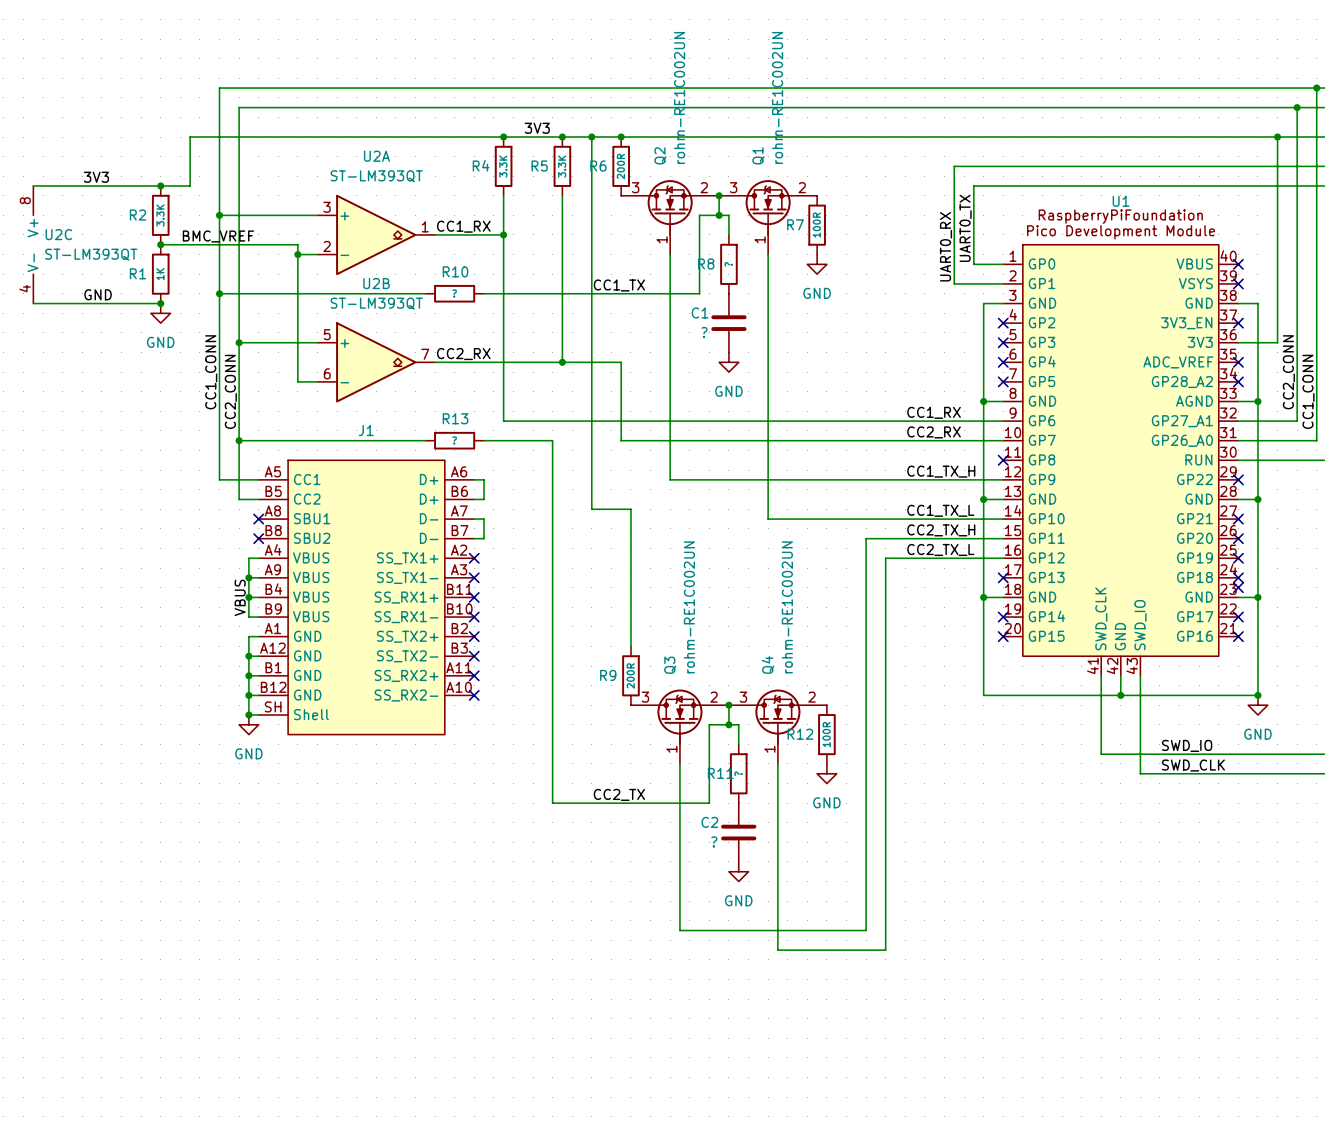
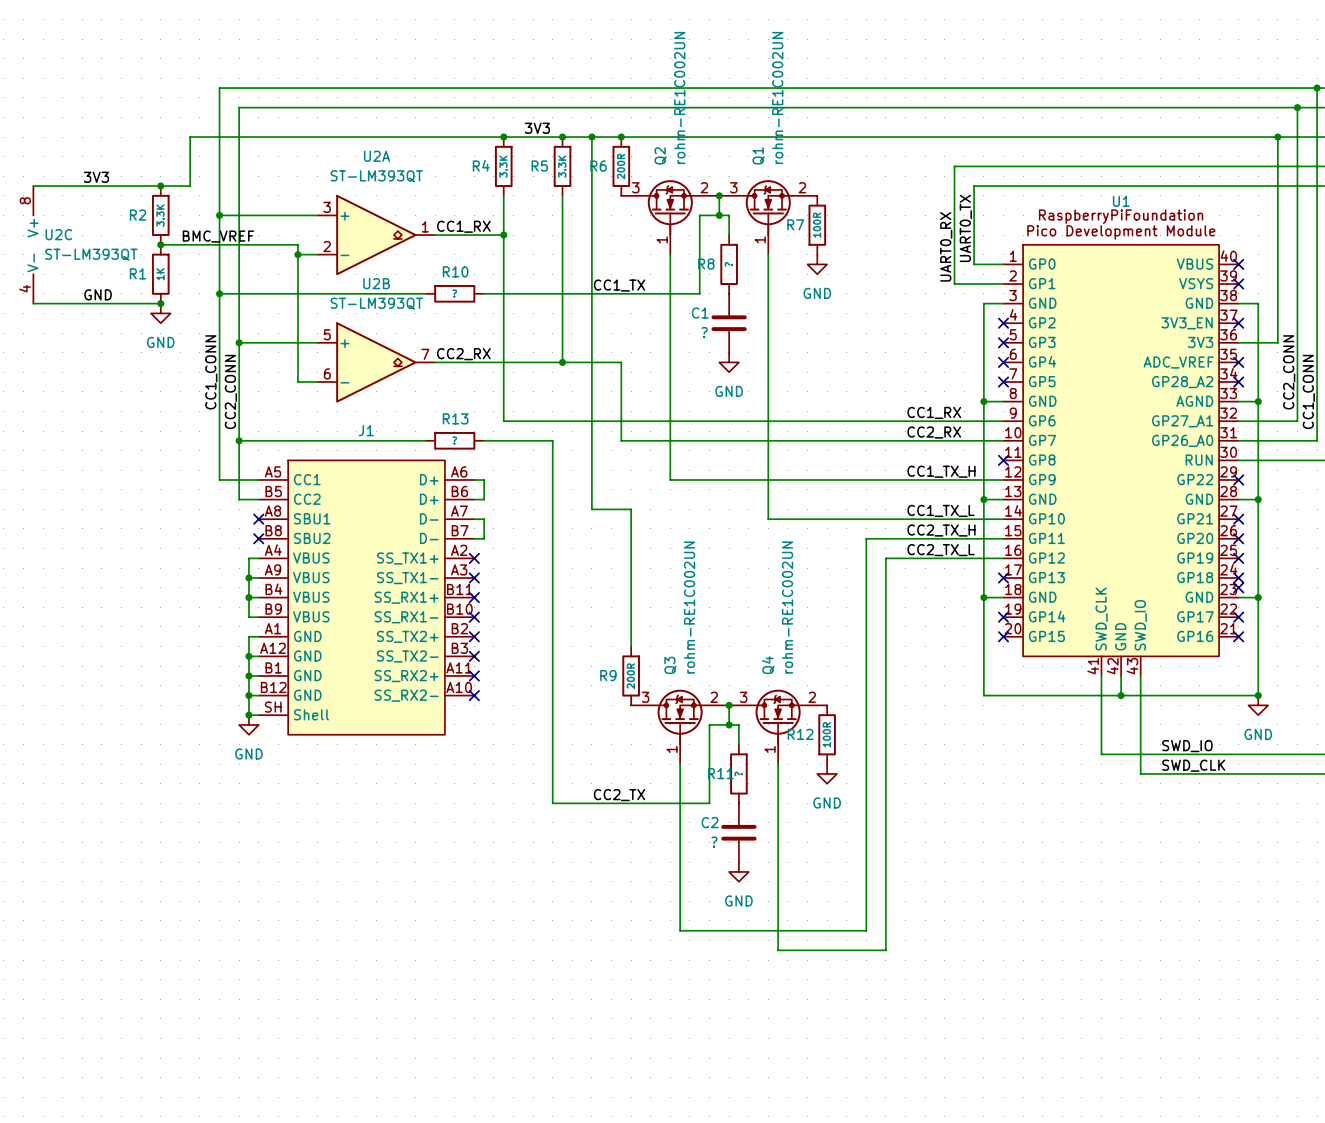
label: VBUS (240, 597) -> none

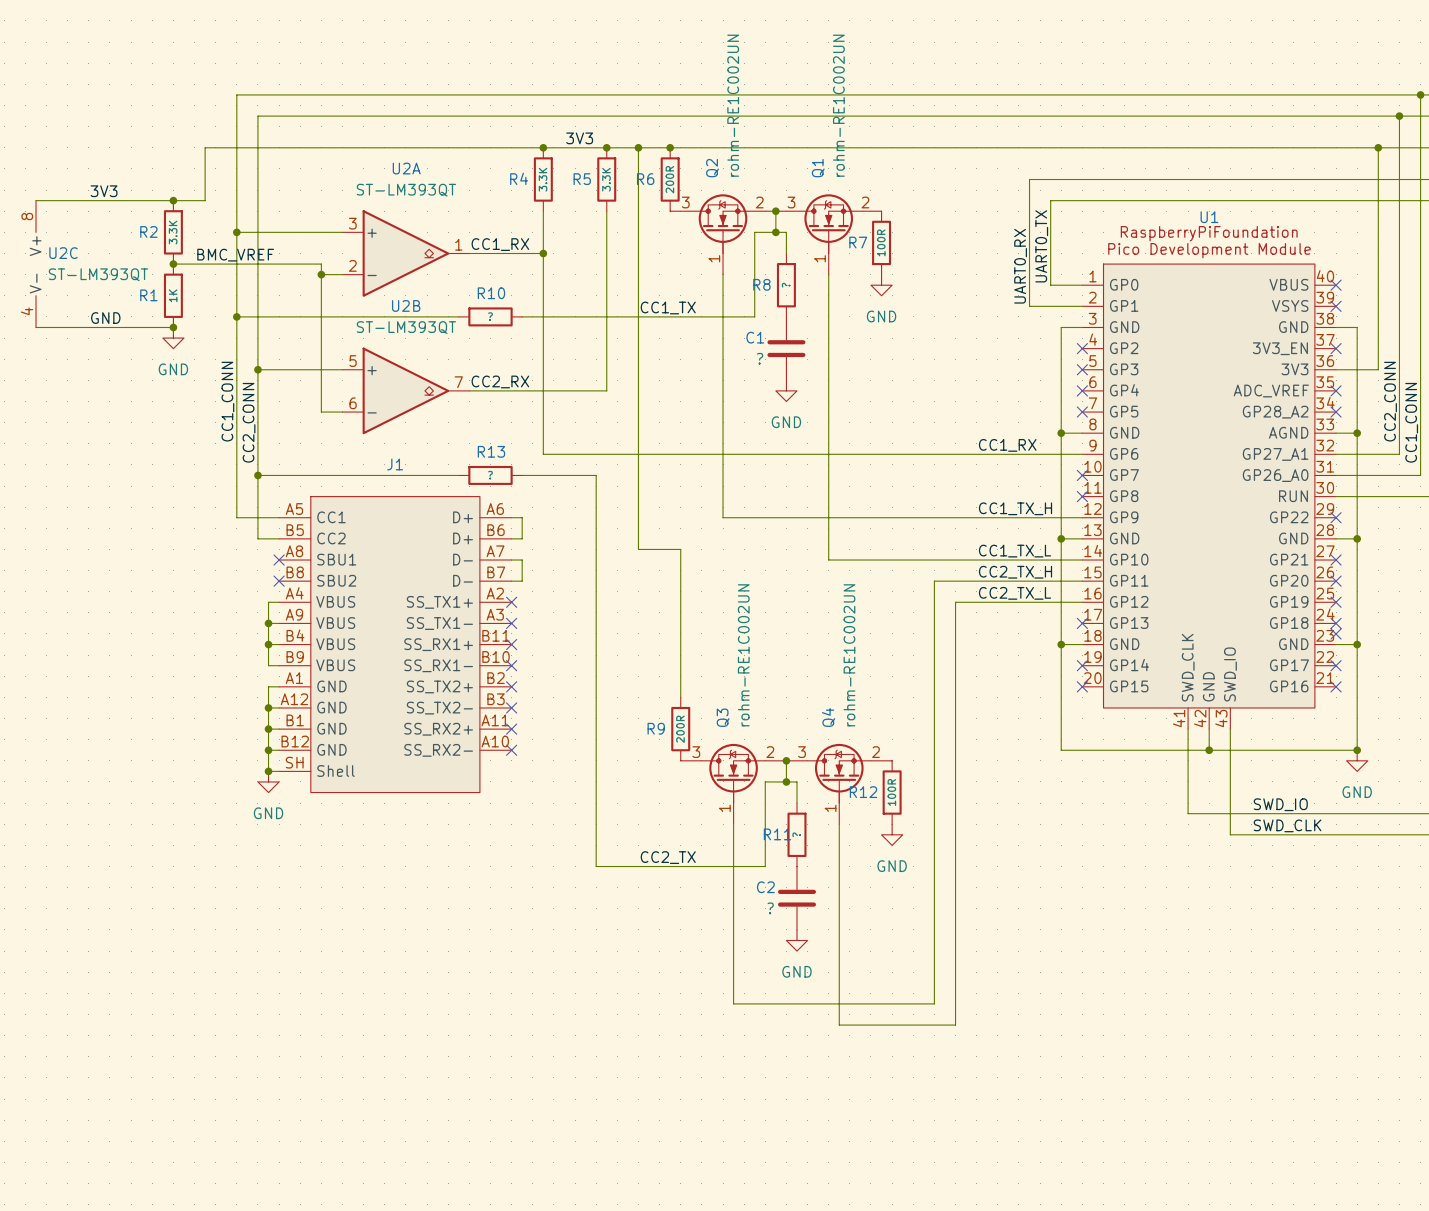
wire: (562, 362) (621, 362) (621, 440) (1003, 440) -> none
junction: (562, 362) -> none
label: CC2_RX (934, 432) -> none
no-connect mark: none -> (1082, 475)

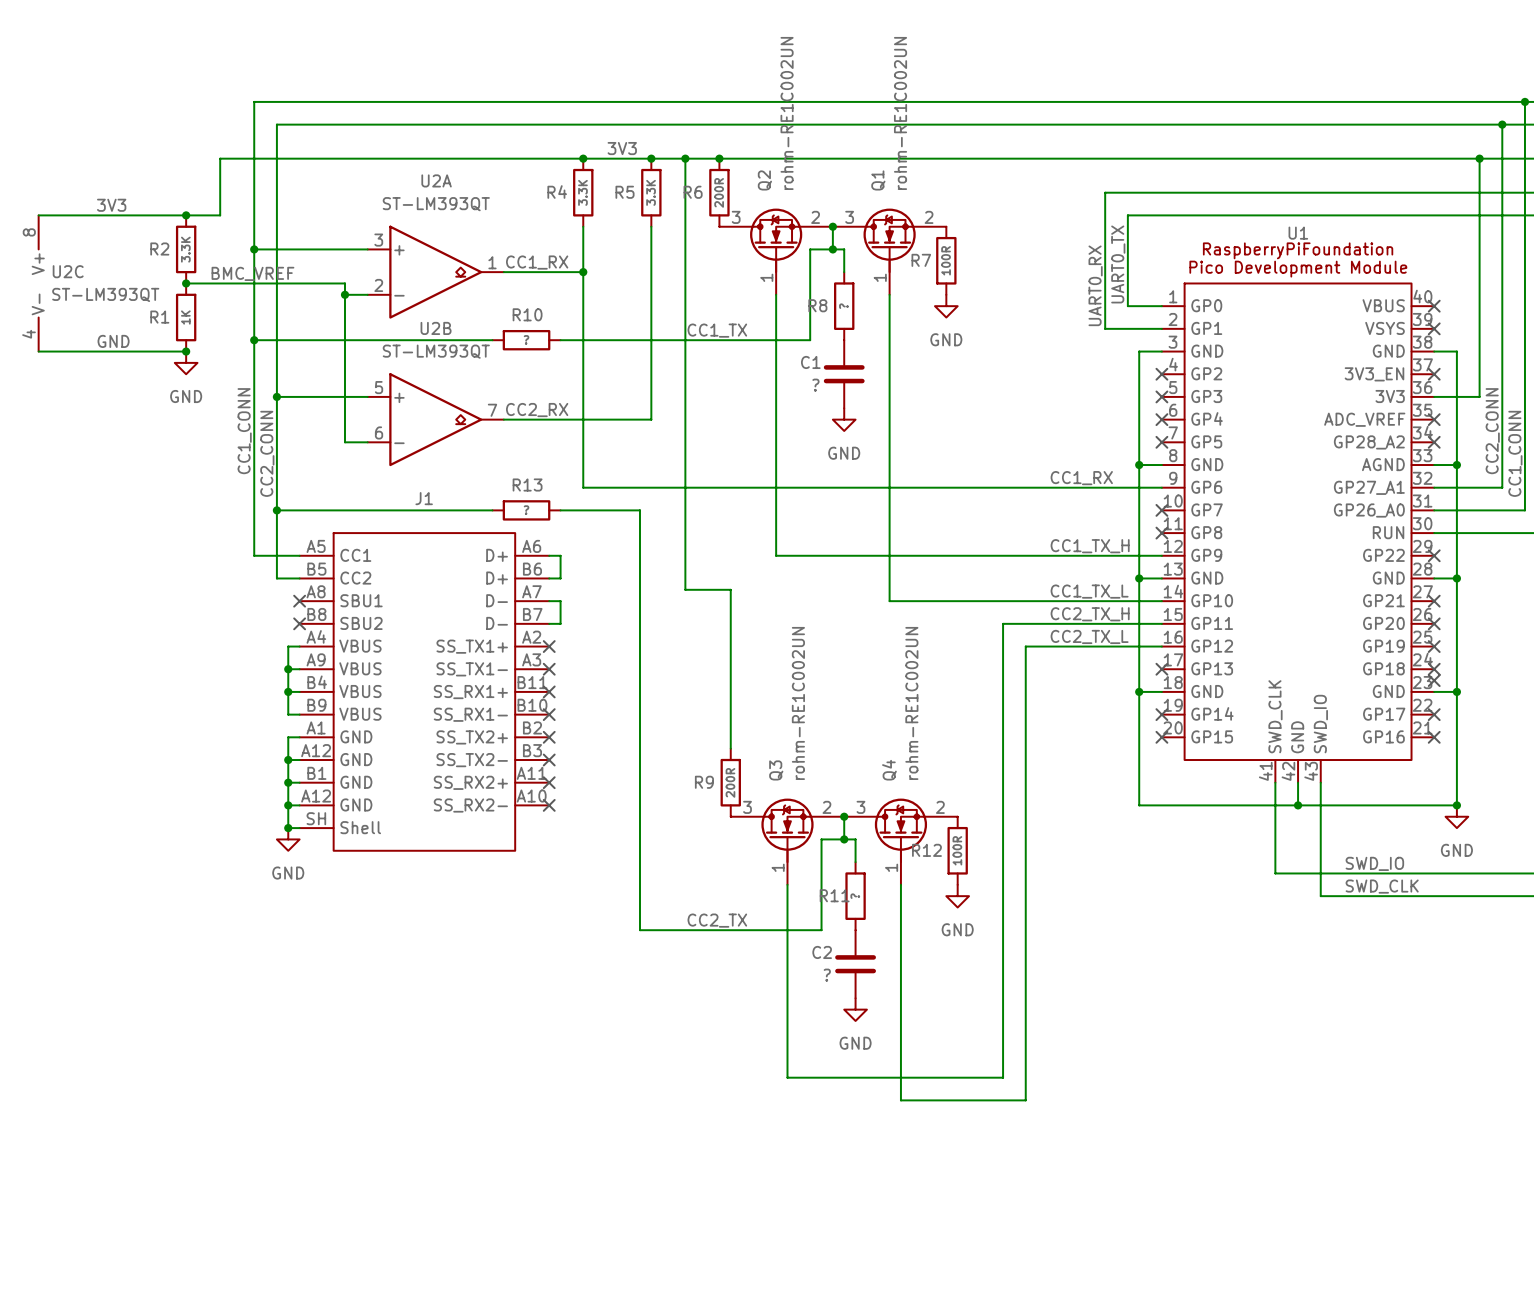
J1 pin number: B12 (295, 741) -> A12 (316, 796)

